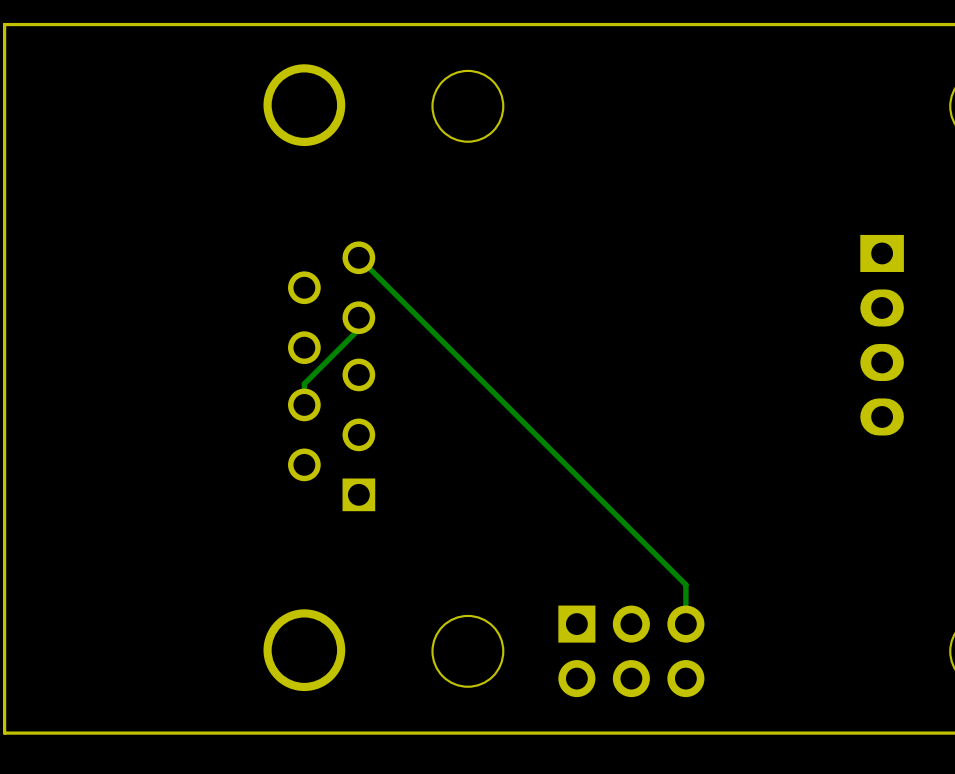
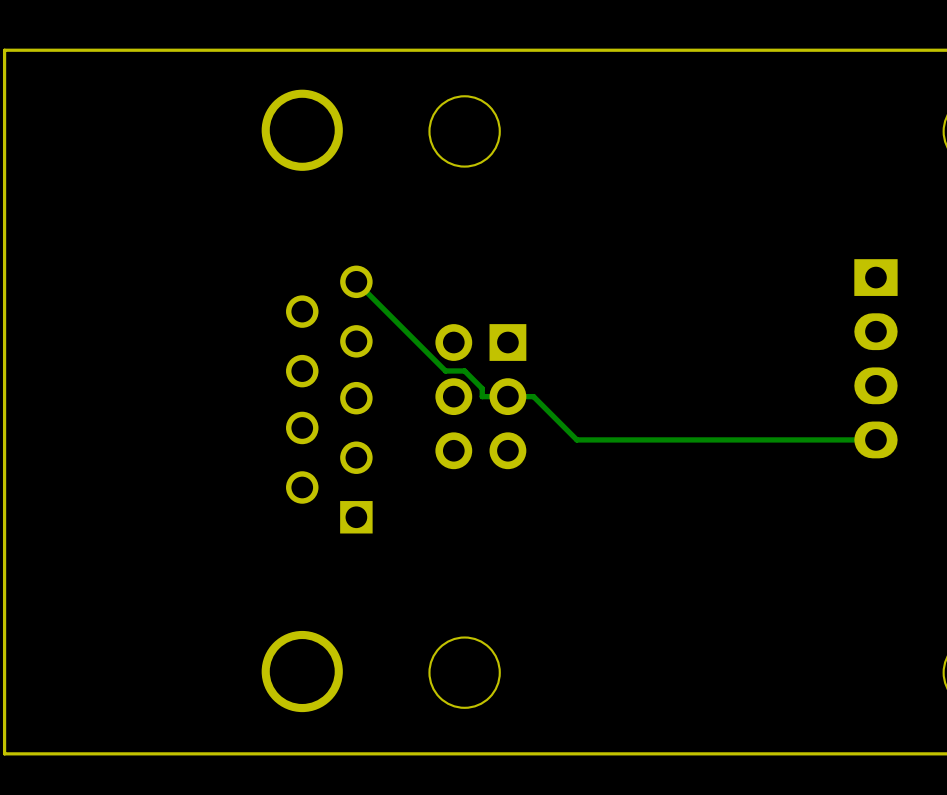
track: (358, 317) (358, 329) (304, 383) (304, 404) -> none
track: (448, 347) (685, 584) (685, 624) -> (445, 370) (464, 370) (482, 388) (482, 396) (533, 396) (576, 439) (875, 439)
part rotation: 0° (631, 651) -> 90° clockwise (480, 396)
part position: (631, 651) -> (480, 396)

